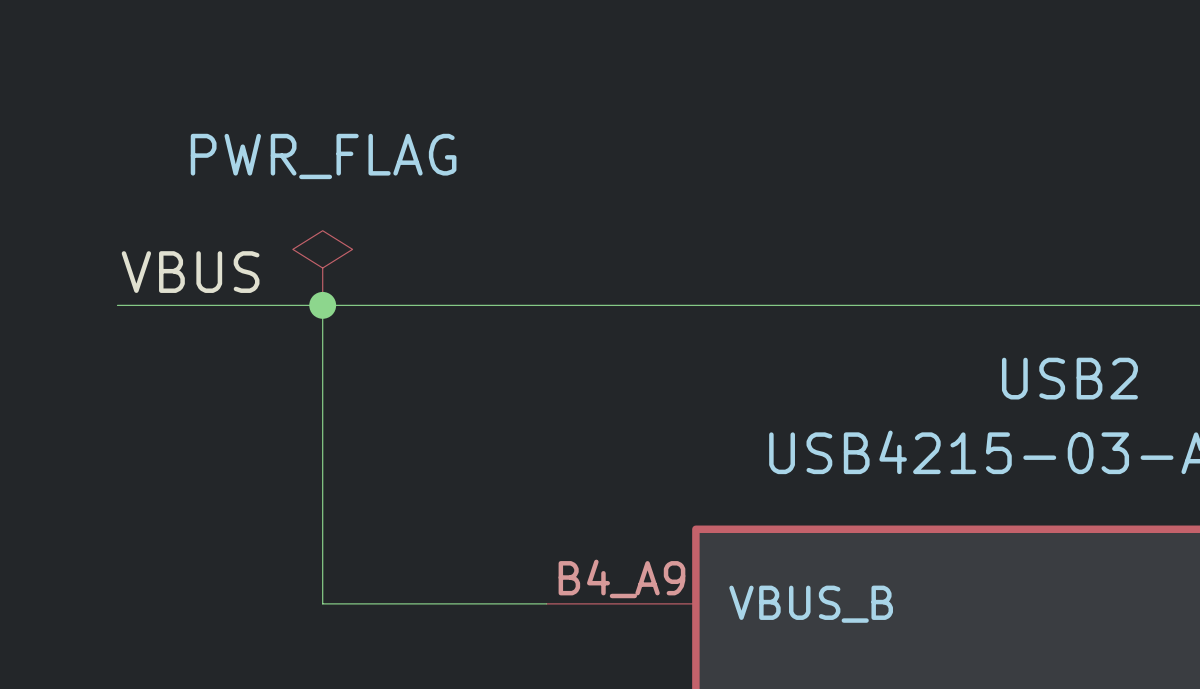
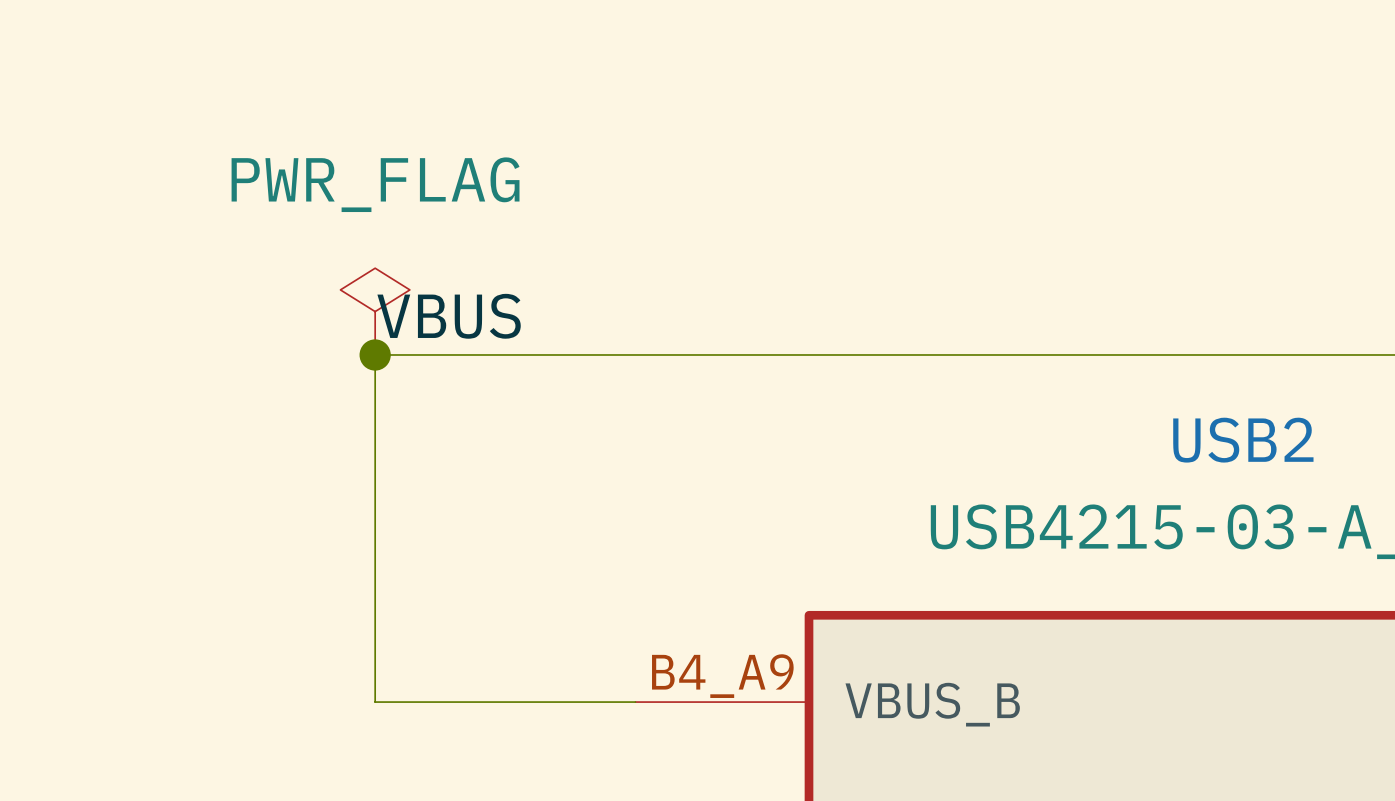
label position: VBUS (190, 272) -> VBUS (449, 316)
wire: (117, 305) (322, 305) -> none

